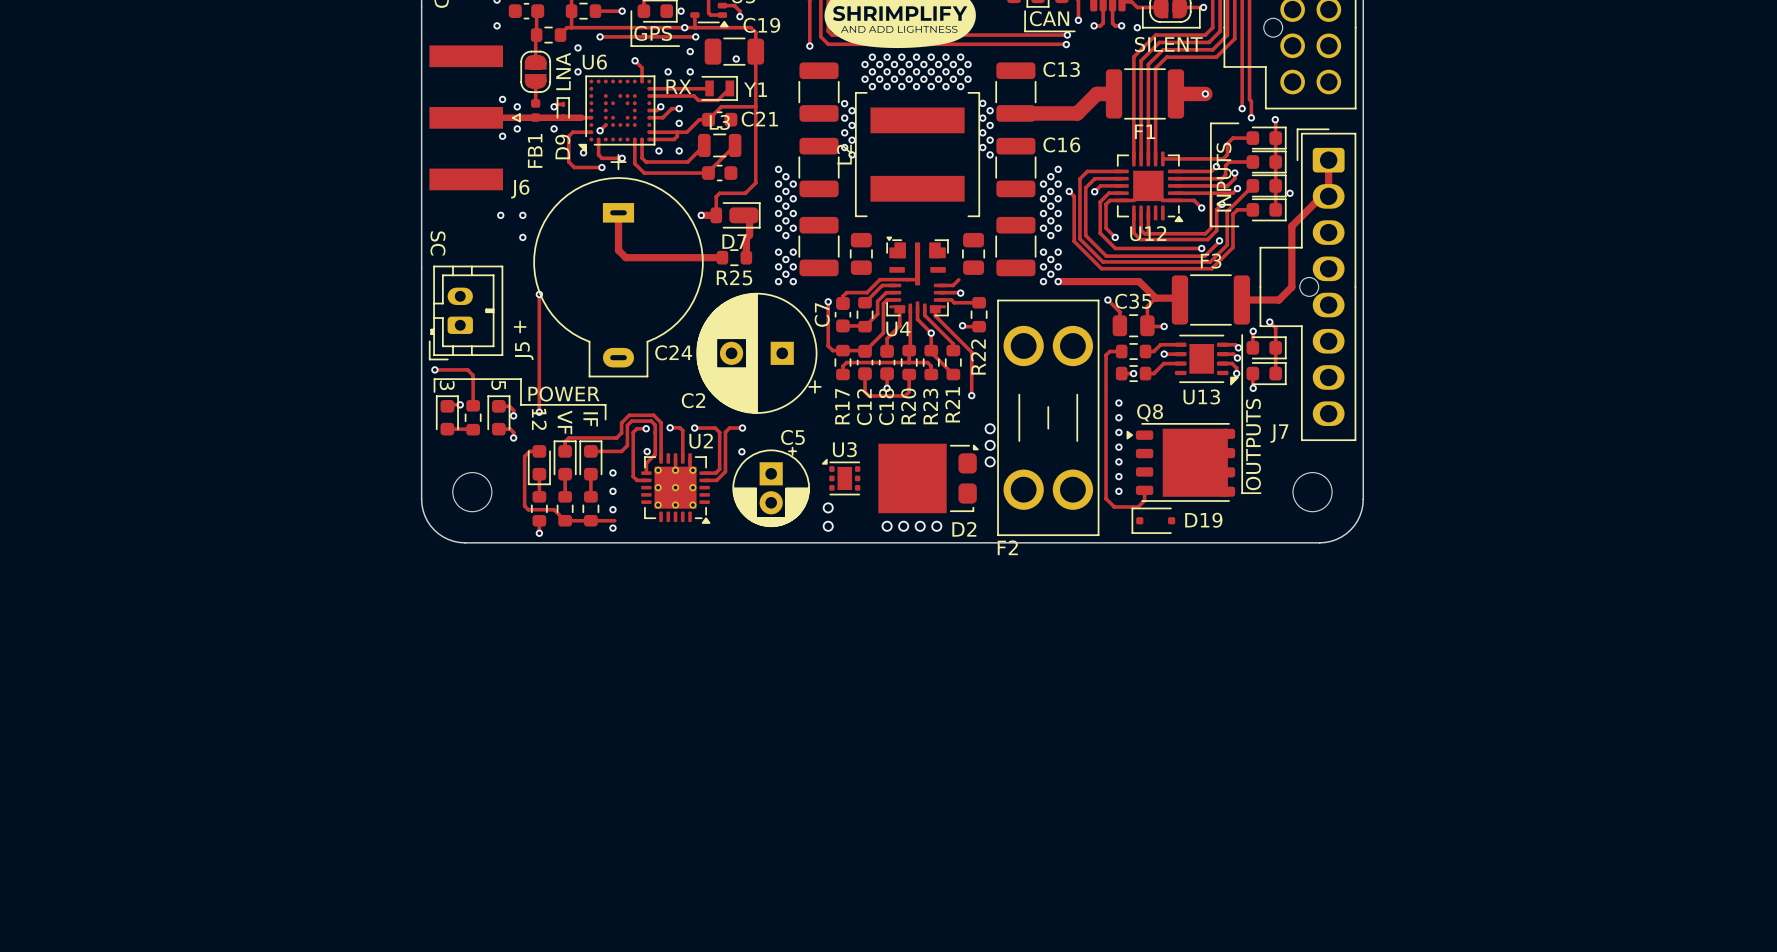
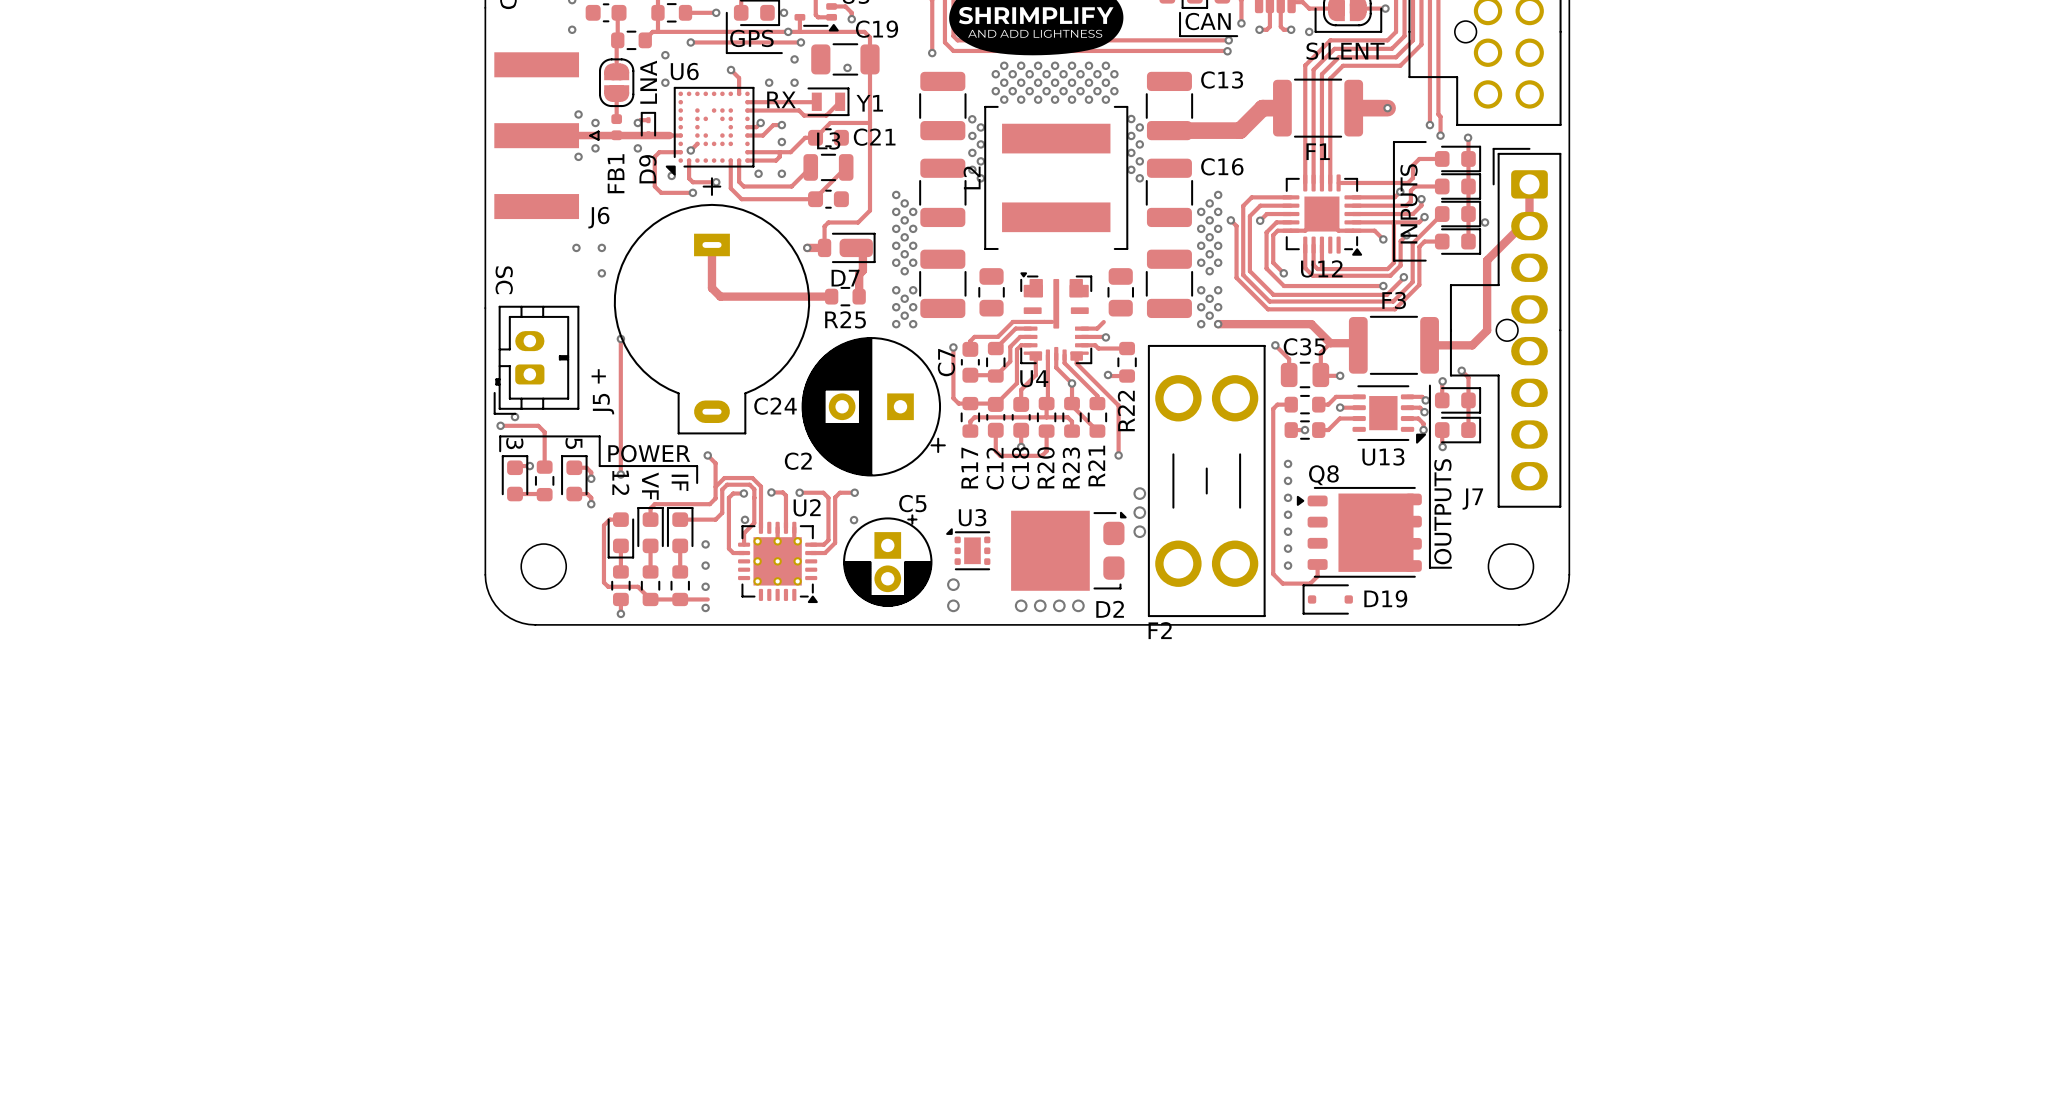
via: none -> (515, 417)
track: none -> (707, 455) (715, 463) (715, 486)
via: none -> (707, 455)

